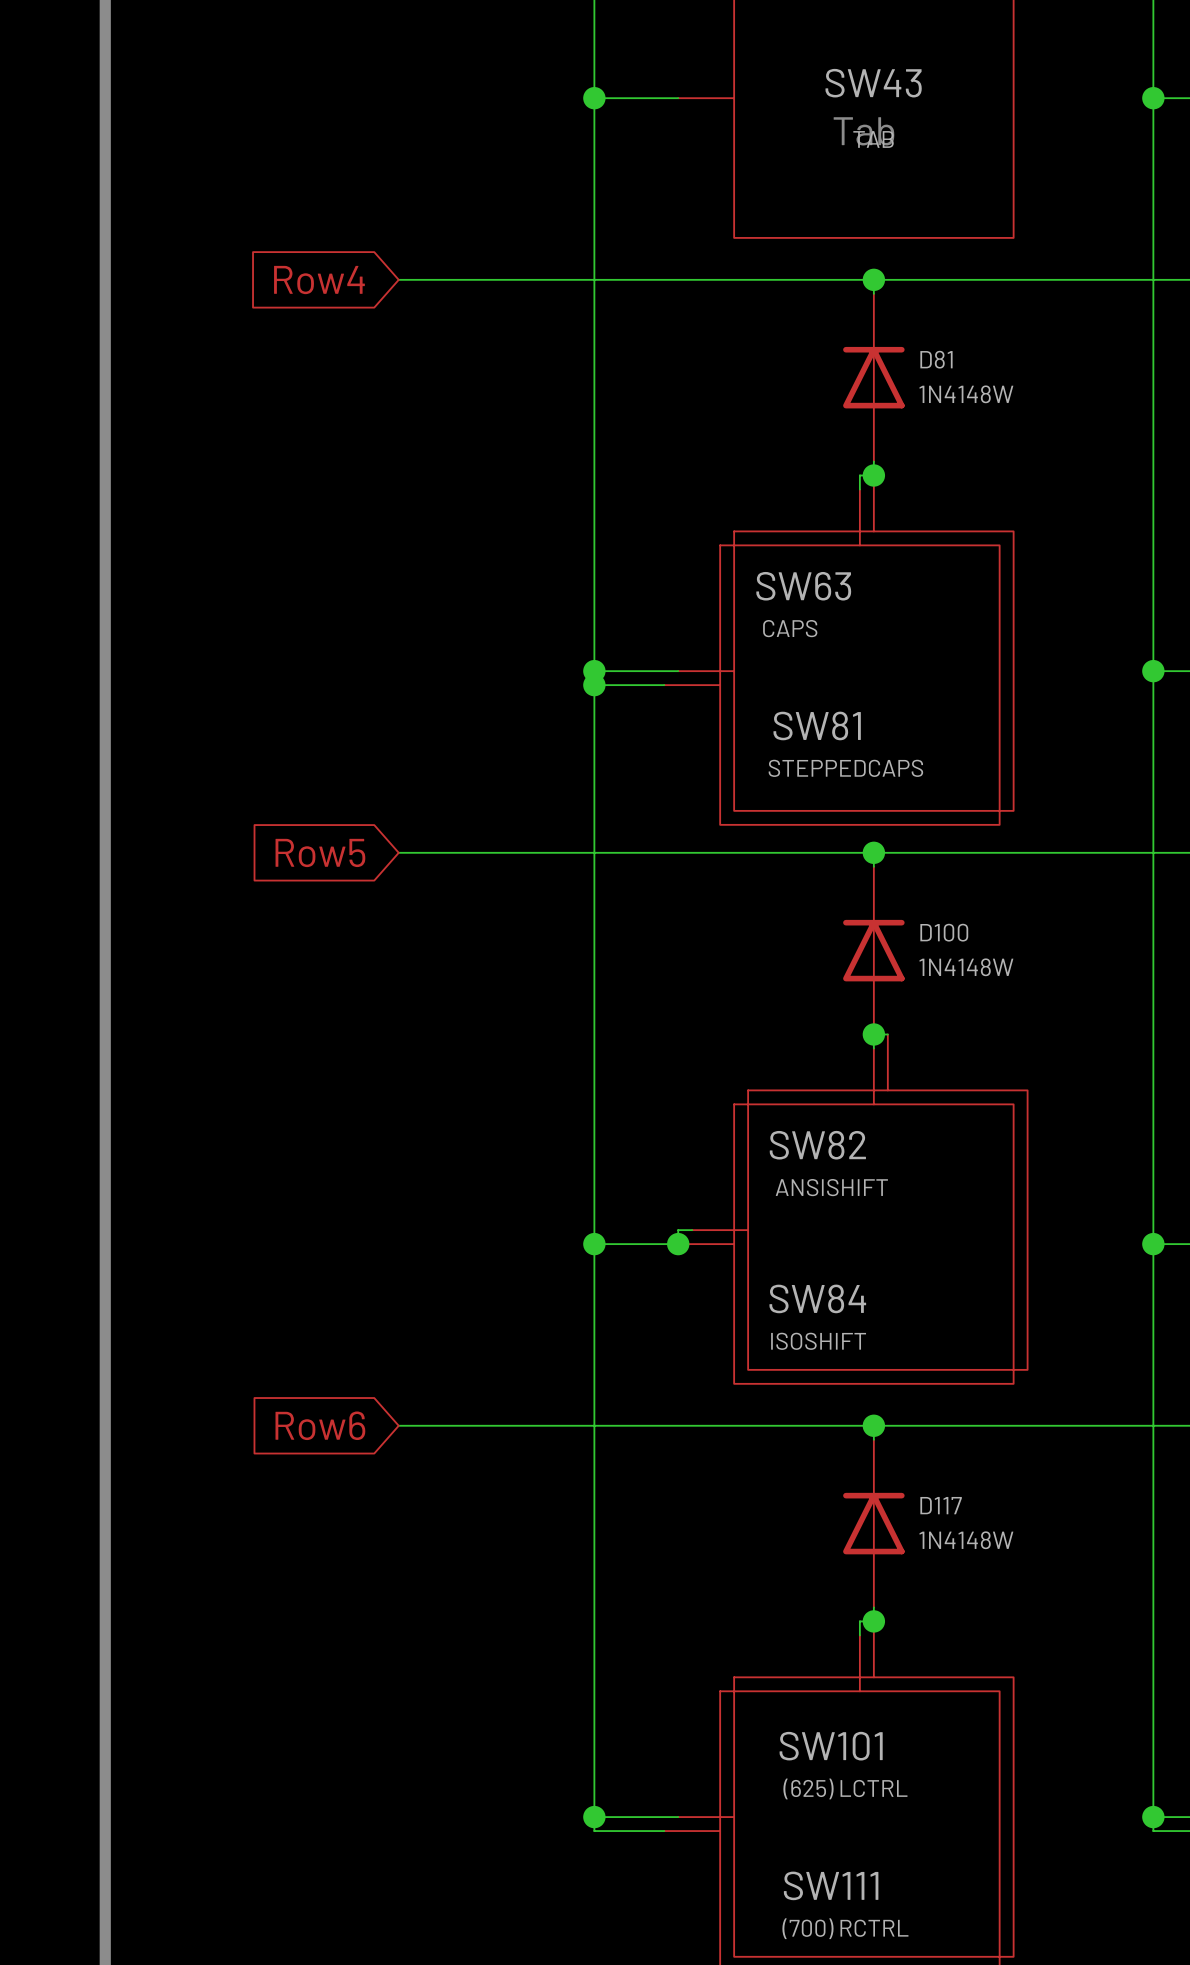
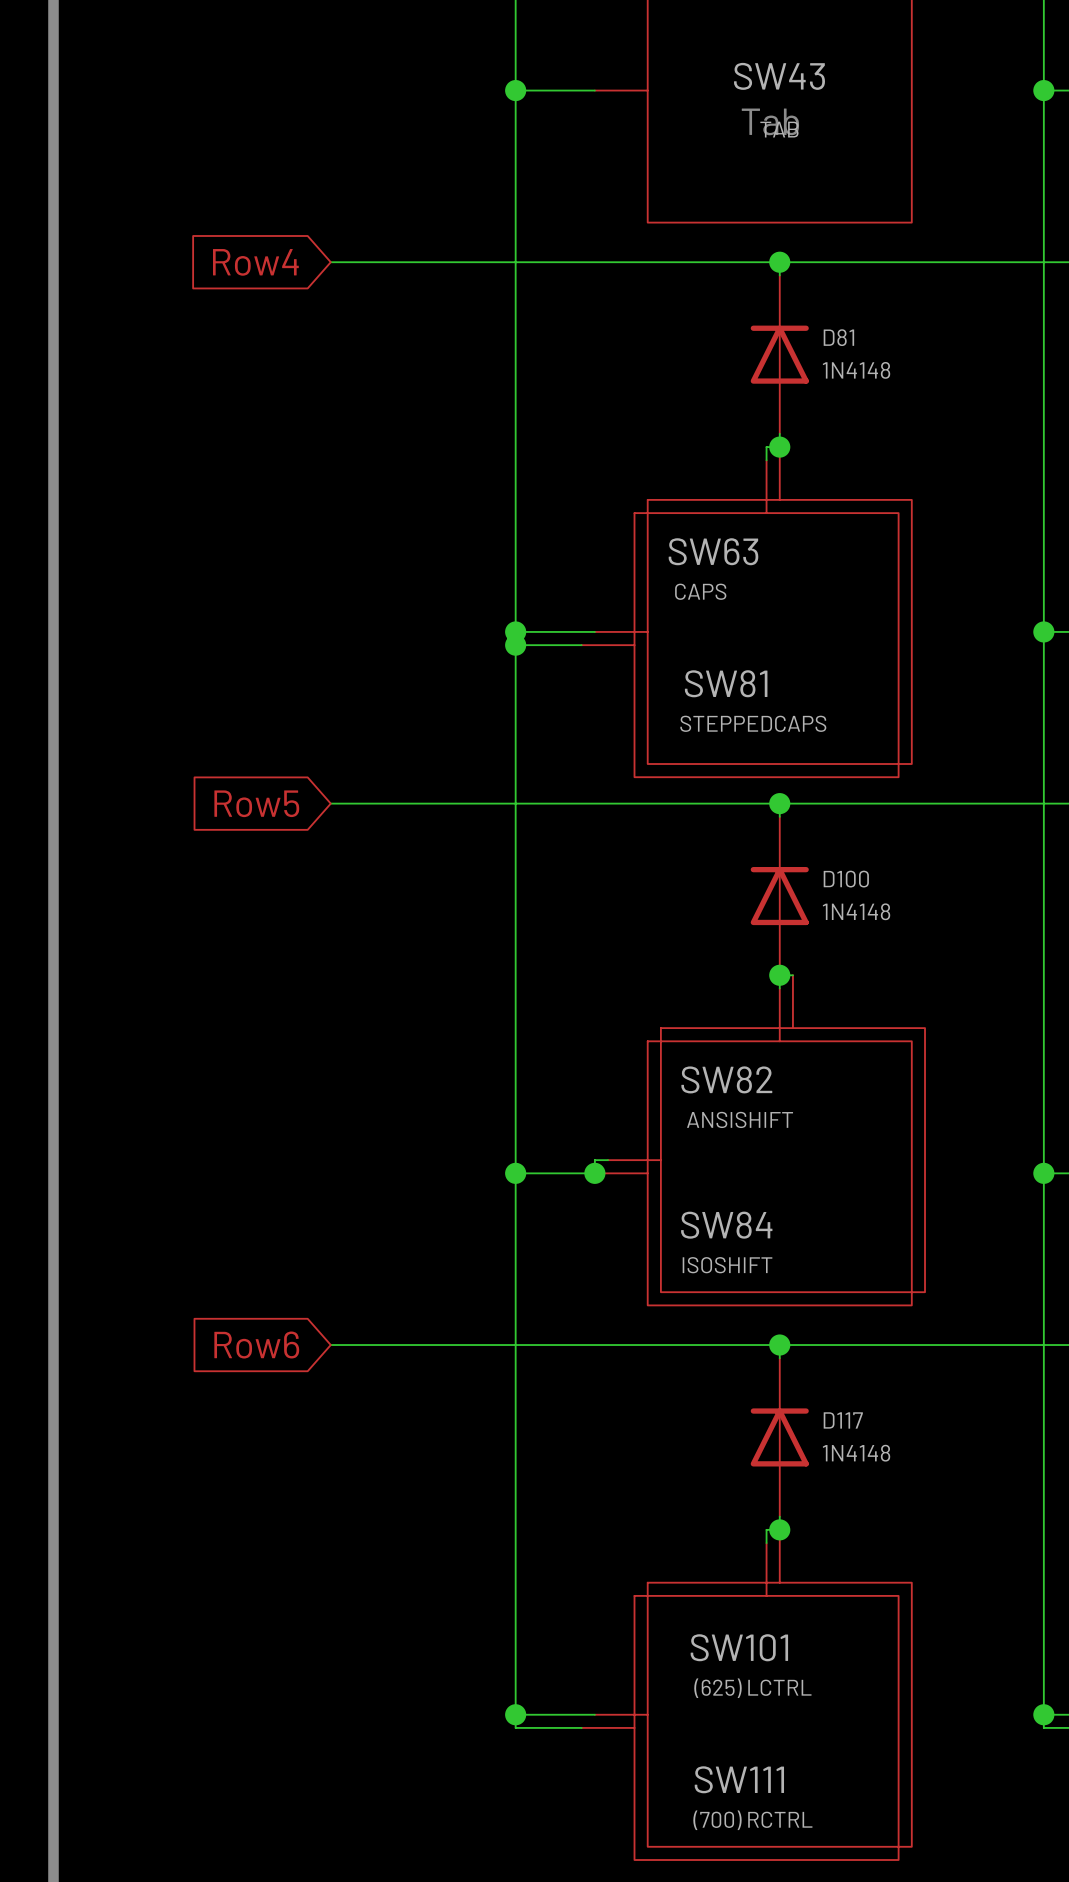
D81 value: 1N4148W (966, 394) -> 1N4148 (856, 370)
D100 value: 1N4148W (966, 967) -> 1N4148 (856, 911)
D117 value: 1N4148W (966, 1540) -> 1N4148 (856, 1453)

